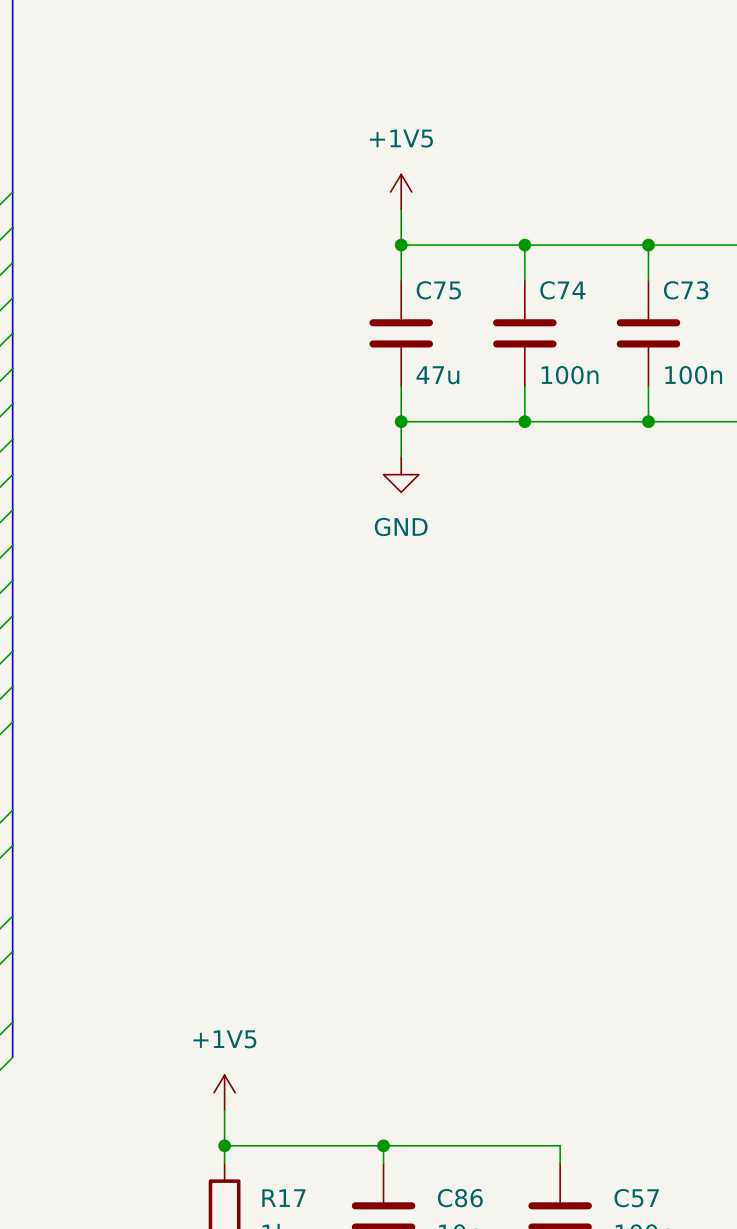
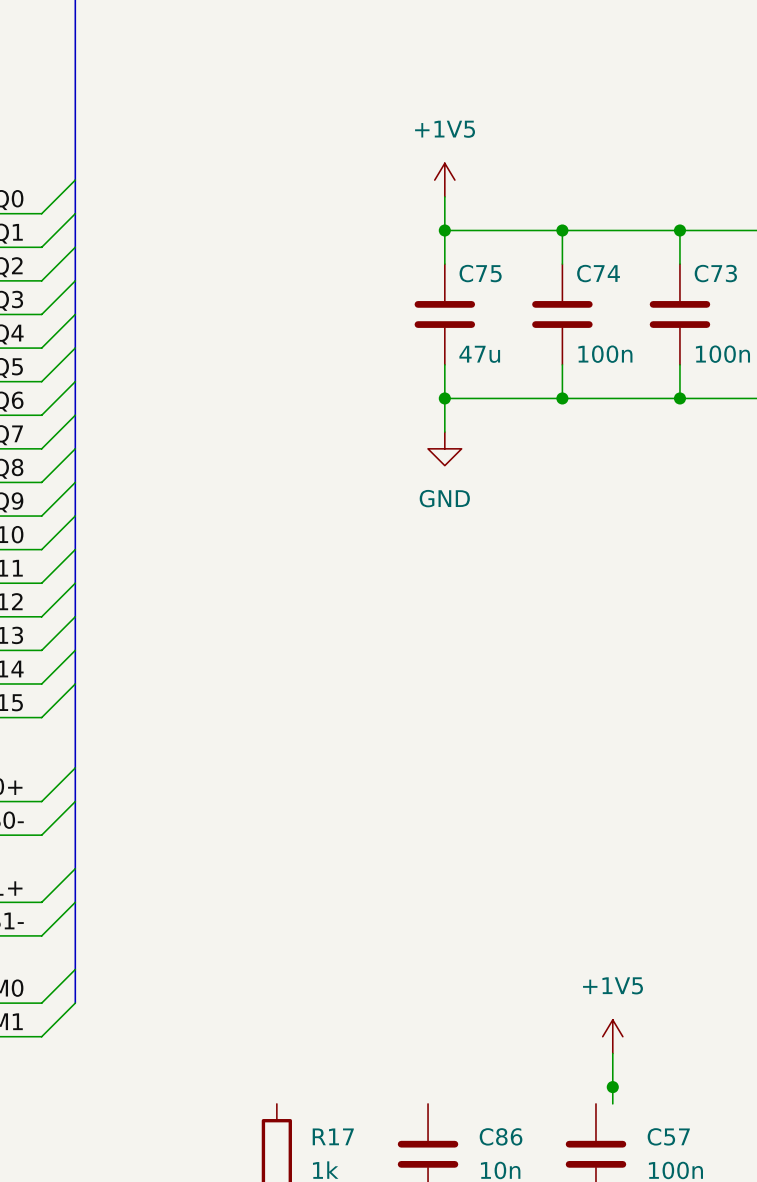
power symbol: +1V5 (224, 1092) -> none
power symbol: none -> +1V5 (612, 1036)
wire: (224, 1110) (224, 1163) -> none
wire: none -> (612, 1053) (612, 1103)
wire: (224, 1145) (560, 1145) (560, 1163) -> none
junction: (224, 1145) -> none
wire: (383, 1145) (383, 1163) -> none
junction: (383, 1145) -> none
junction: none -> (612, 1087)

